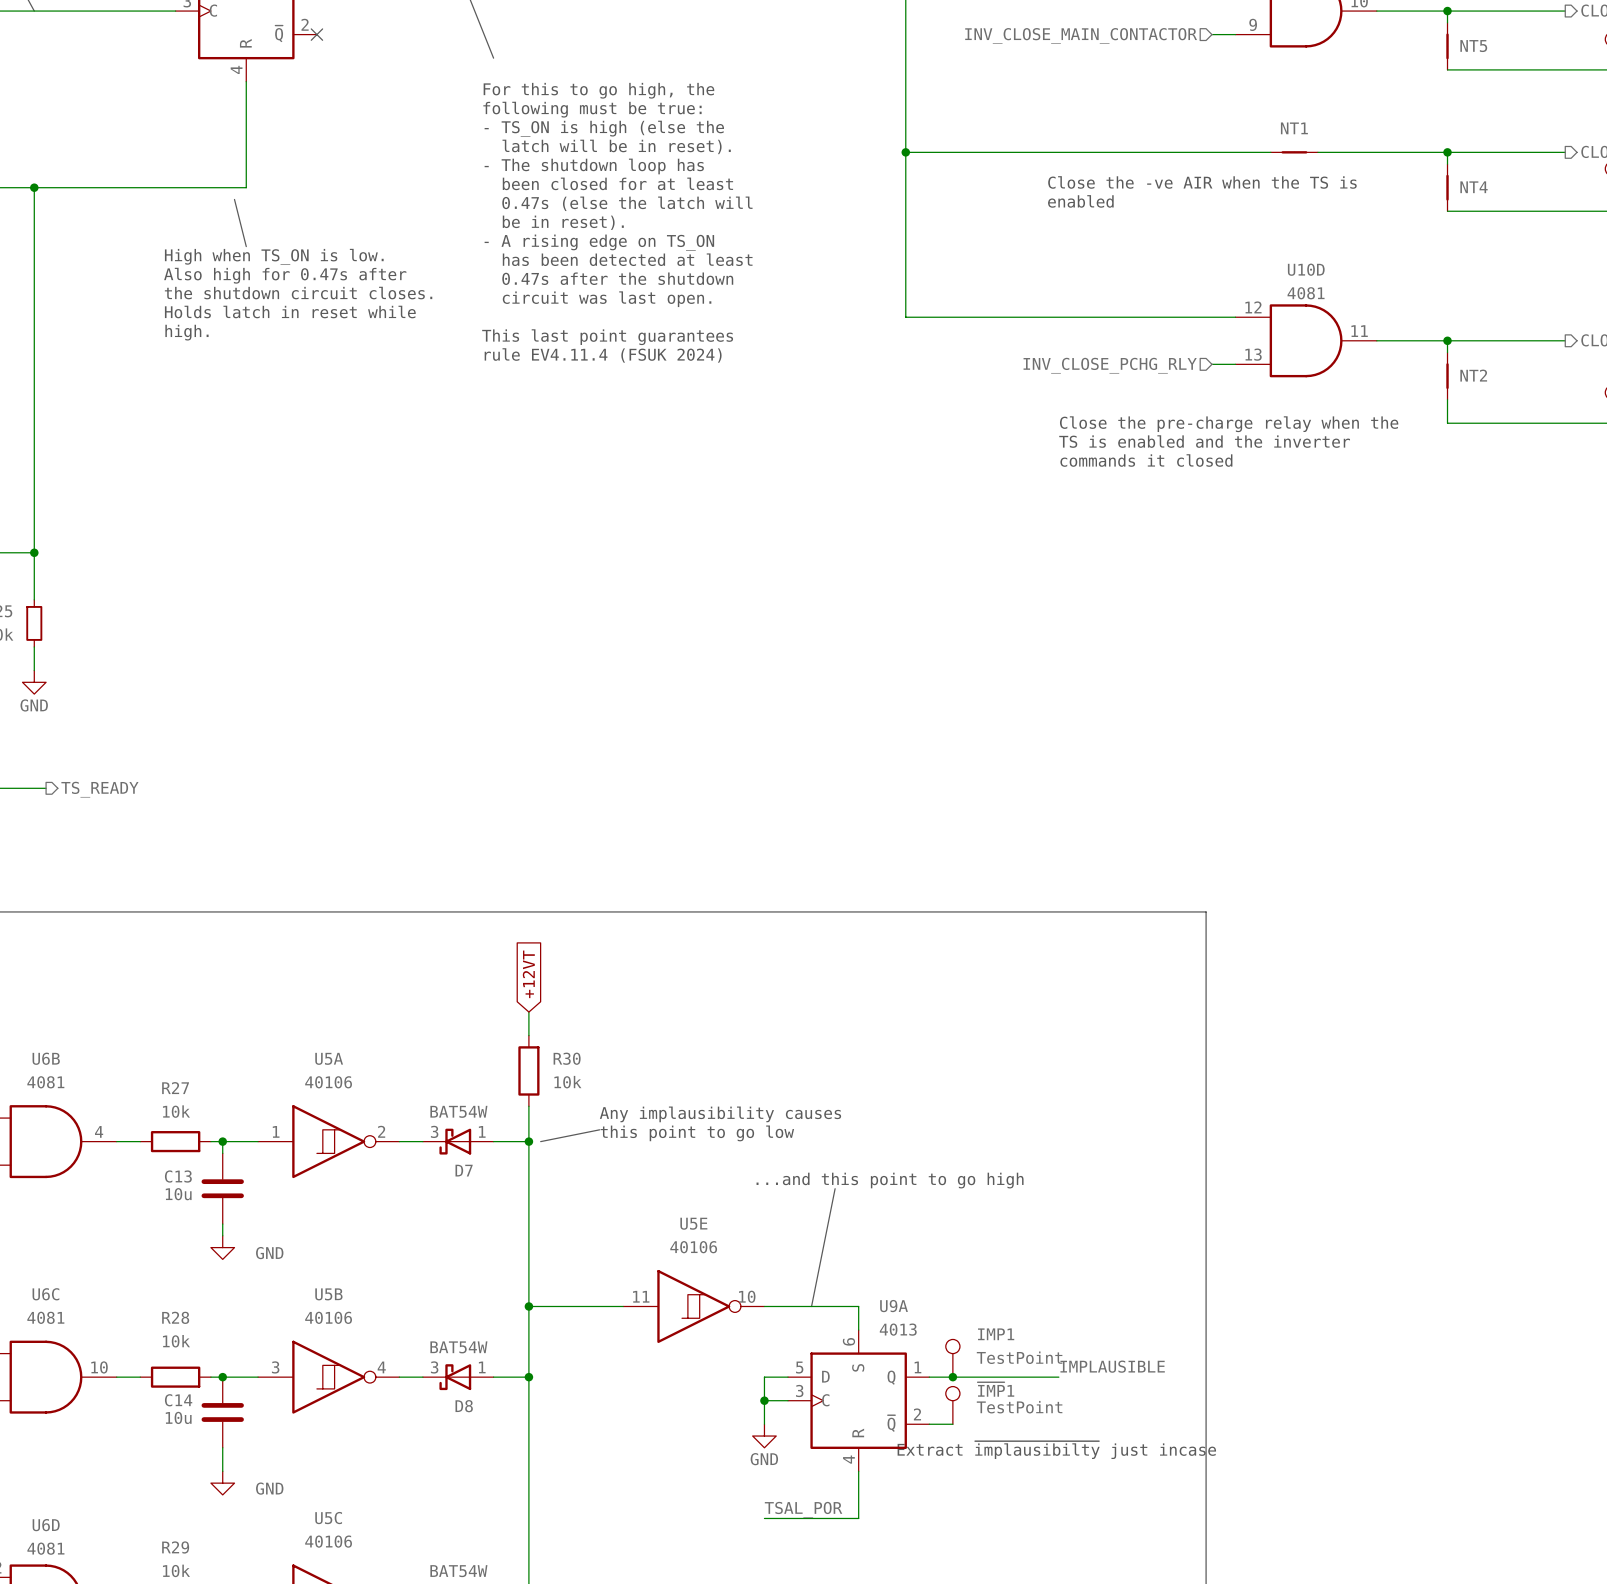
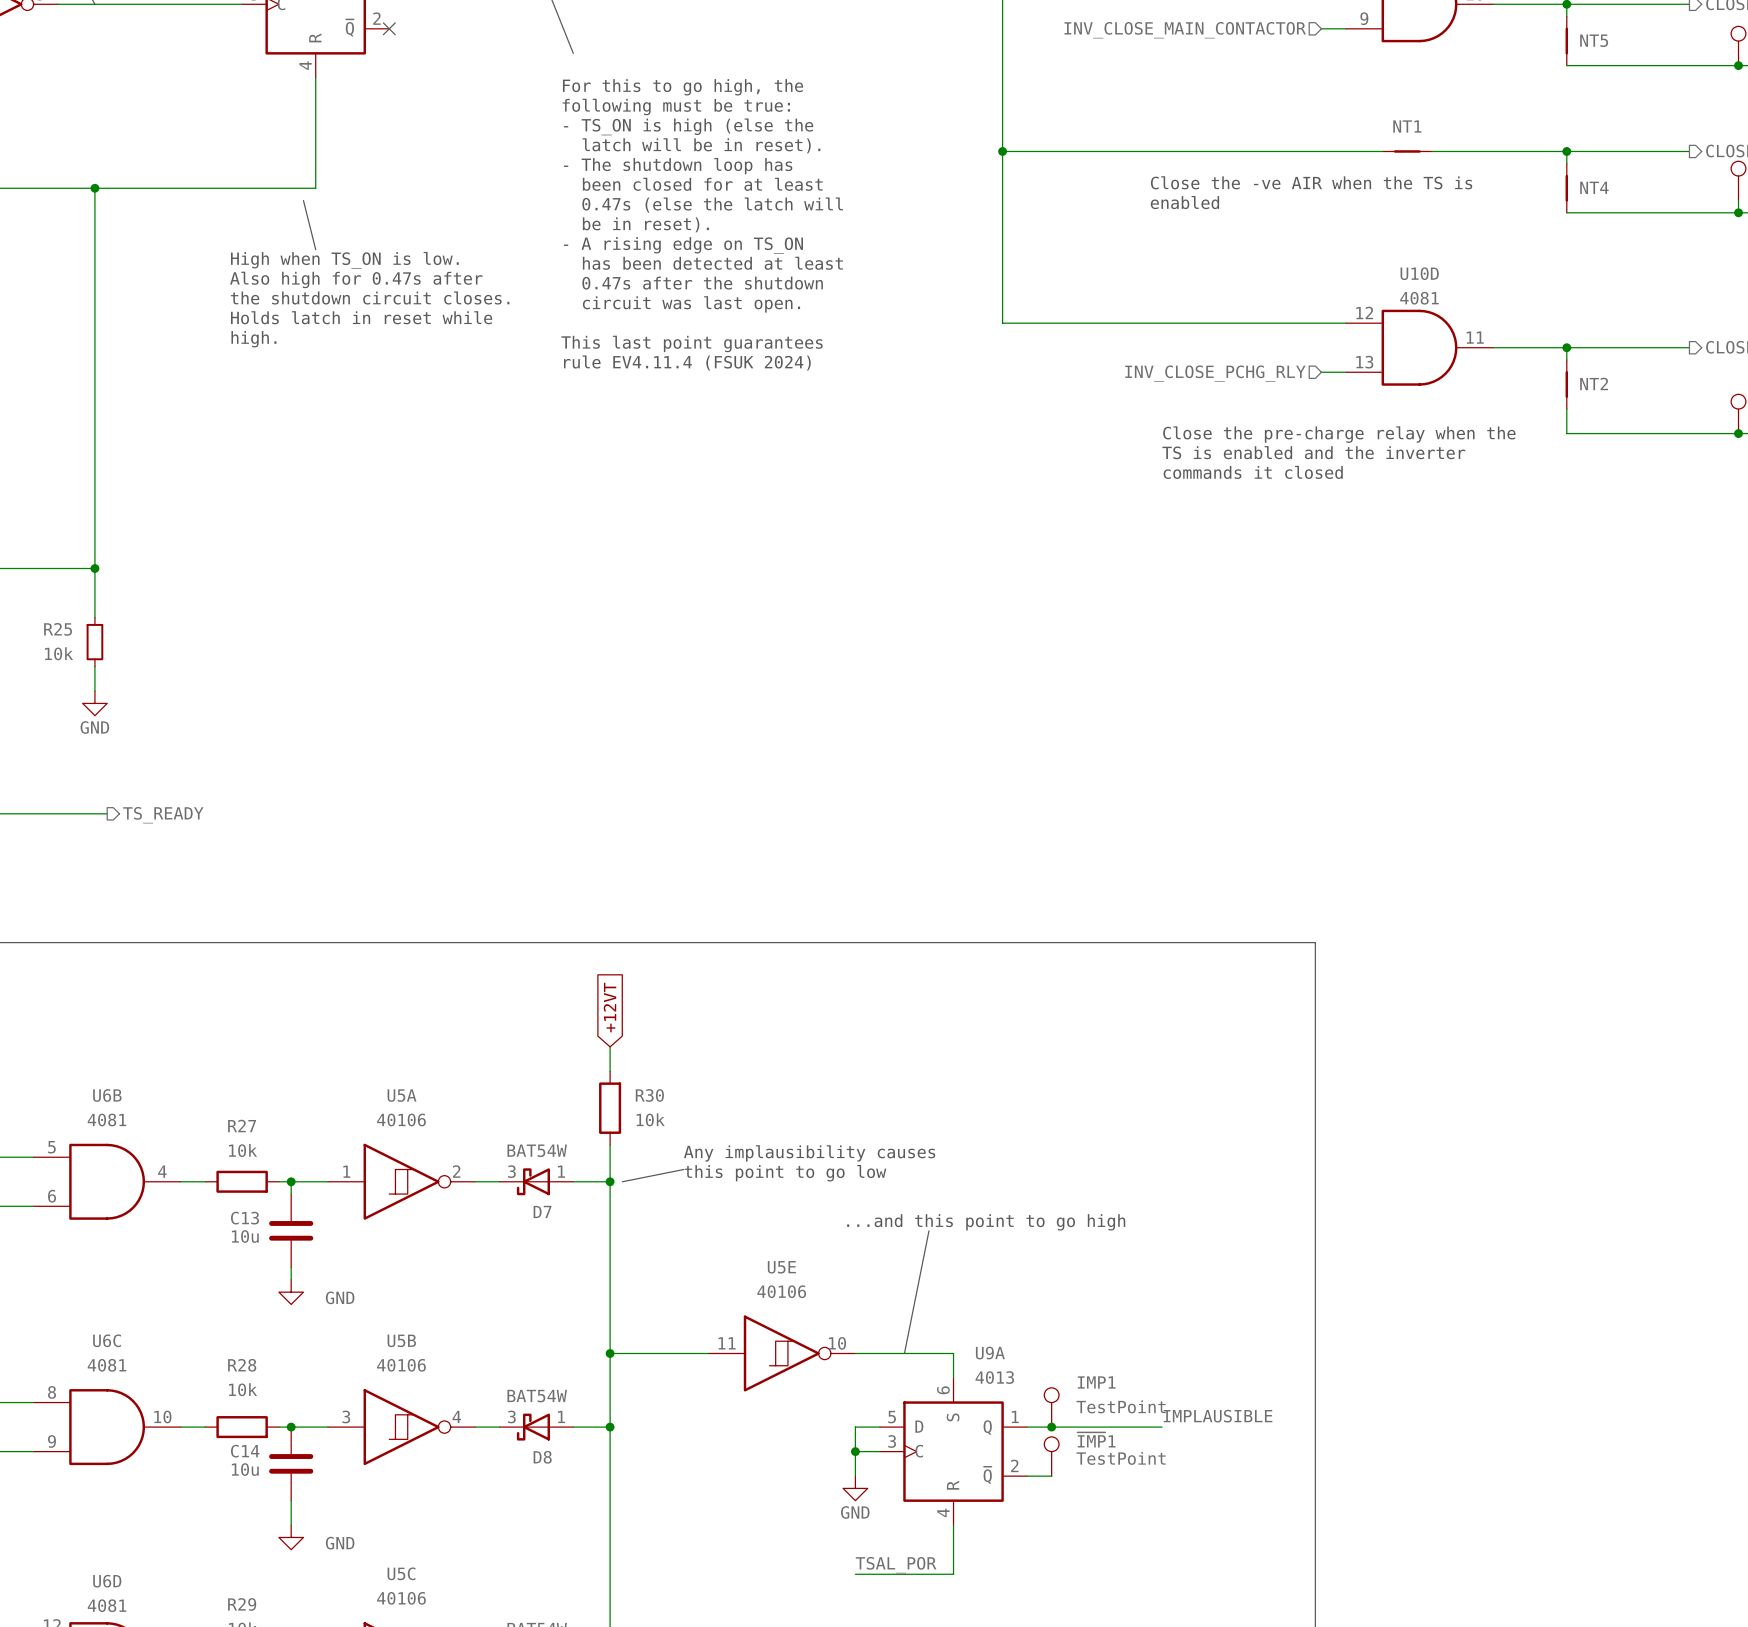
text: Extract ~{implausibilty} just incase (1056, 1450) -> none

